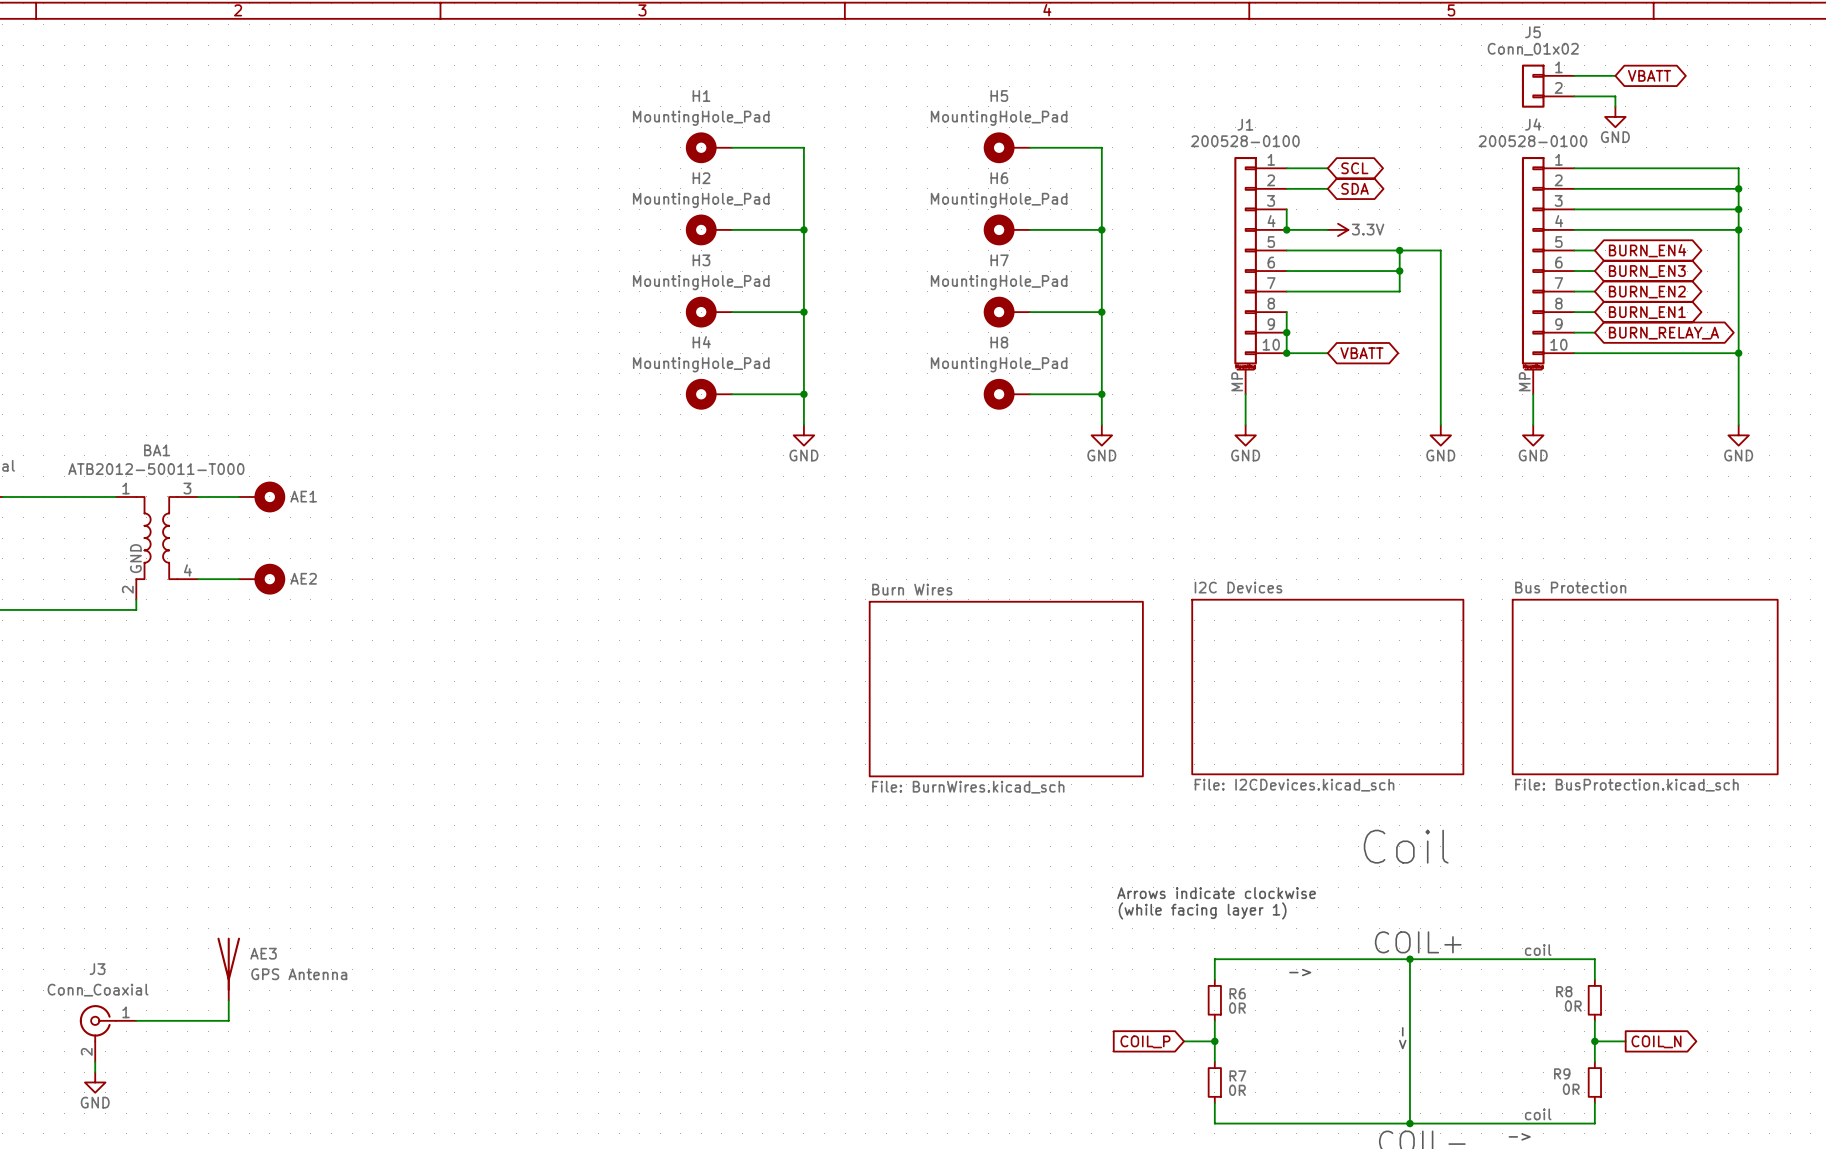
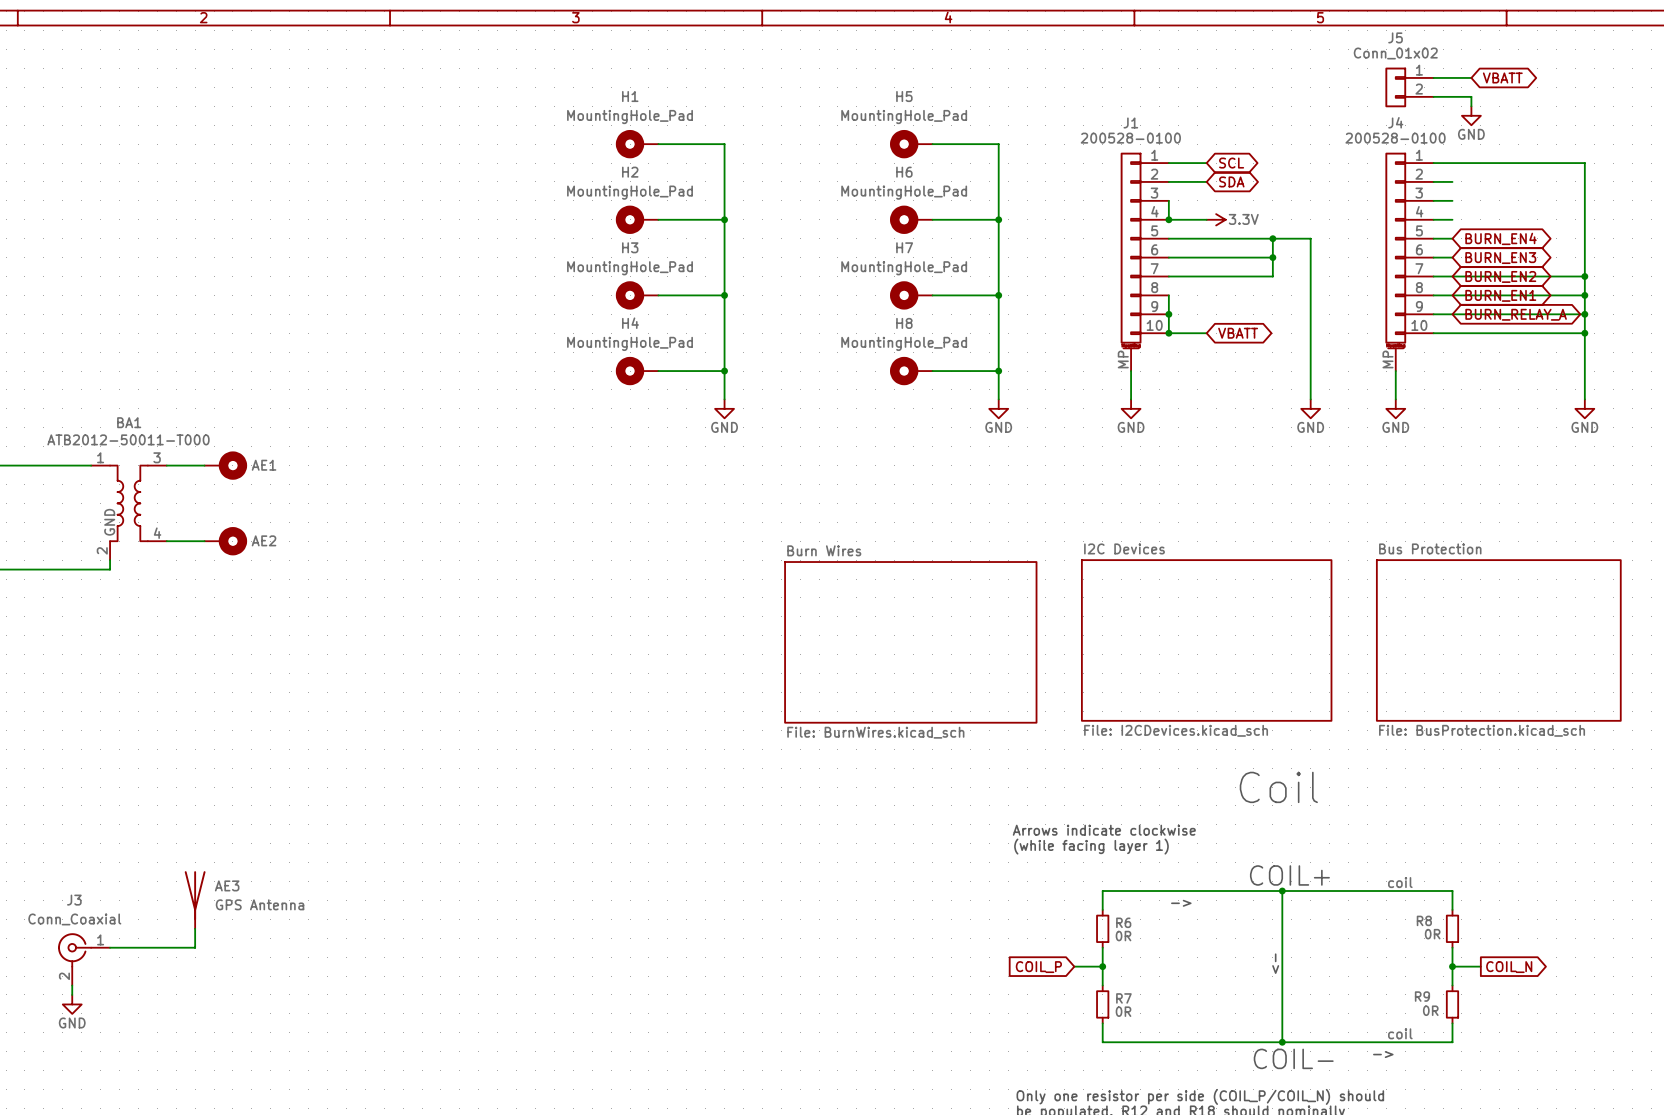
wire: (1594, 188) (1738, 188) -> (1452, 276) (1584, 276)
junction: (1738, 188) -> none
wire: (1594, 209) (1738, 209) -> (1452, 295) (1584, 295)
junction: (1738, 209) -> none
wire: (1594, 229) (1738, 229) -> (1452, 314) (1584, 314)
junction: (1738, 229) -> none
junction: none -> (1584, 276)
junction: none -> (1584, 295)
junction: none -> (1584, 314)

